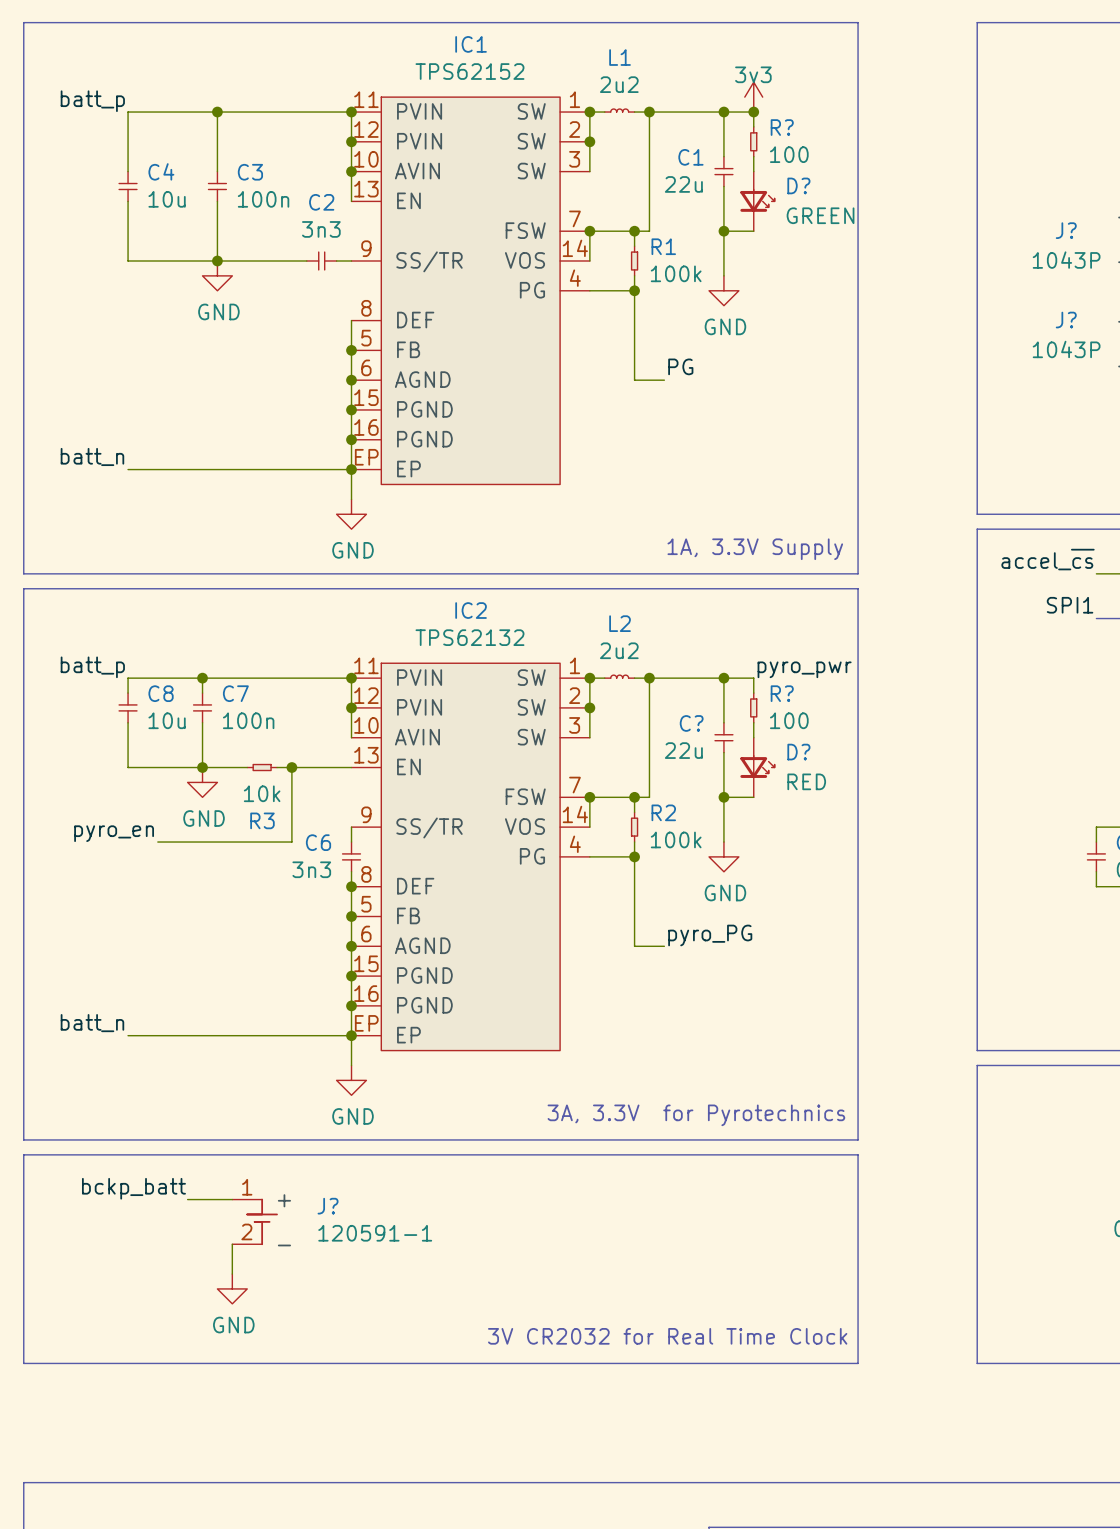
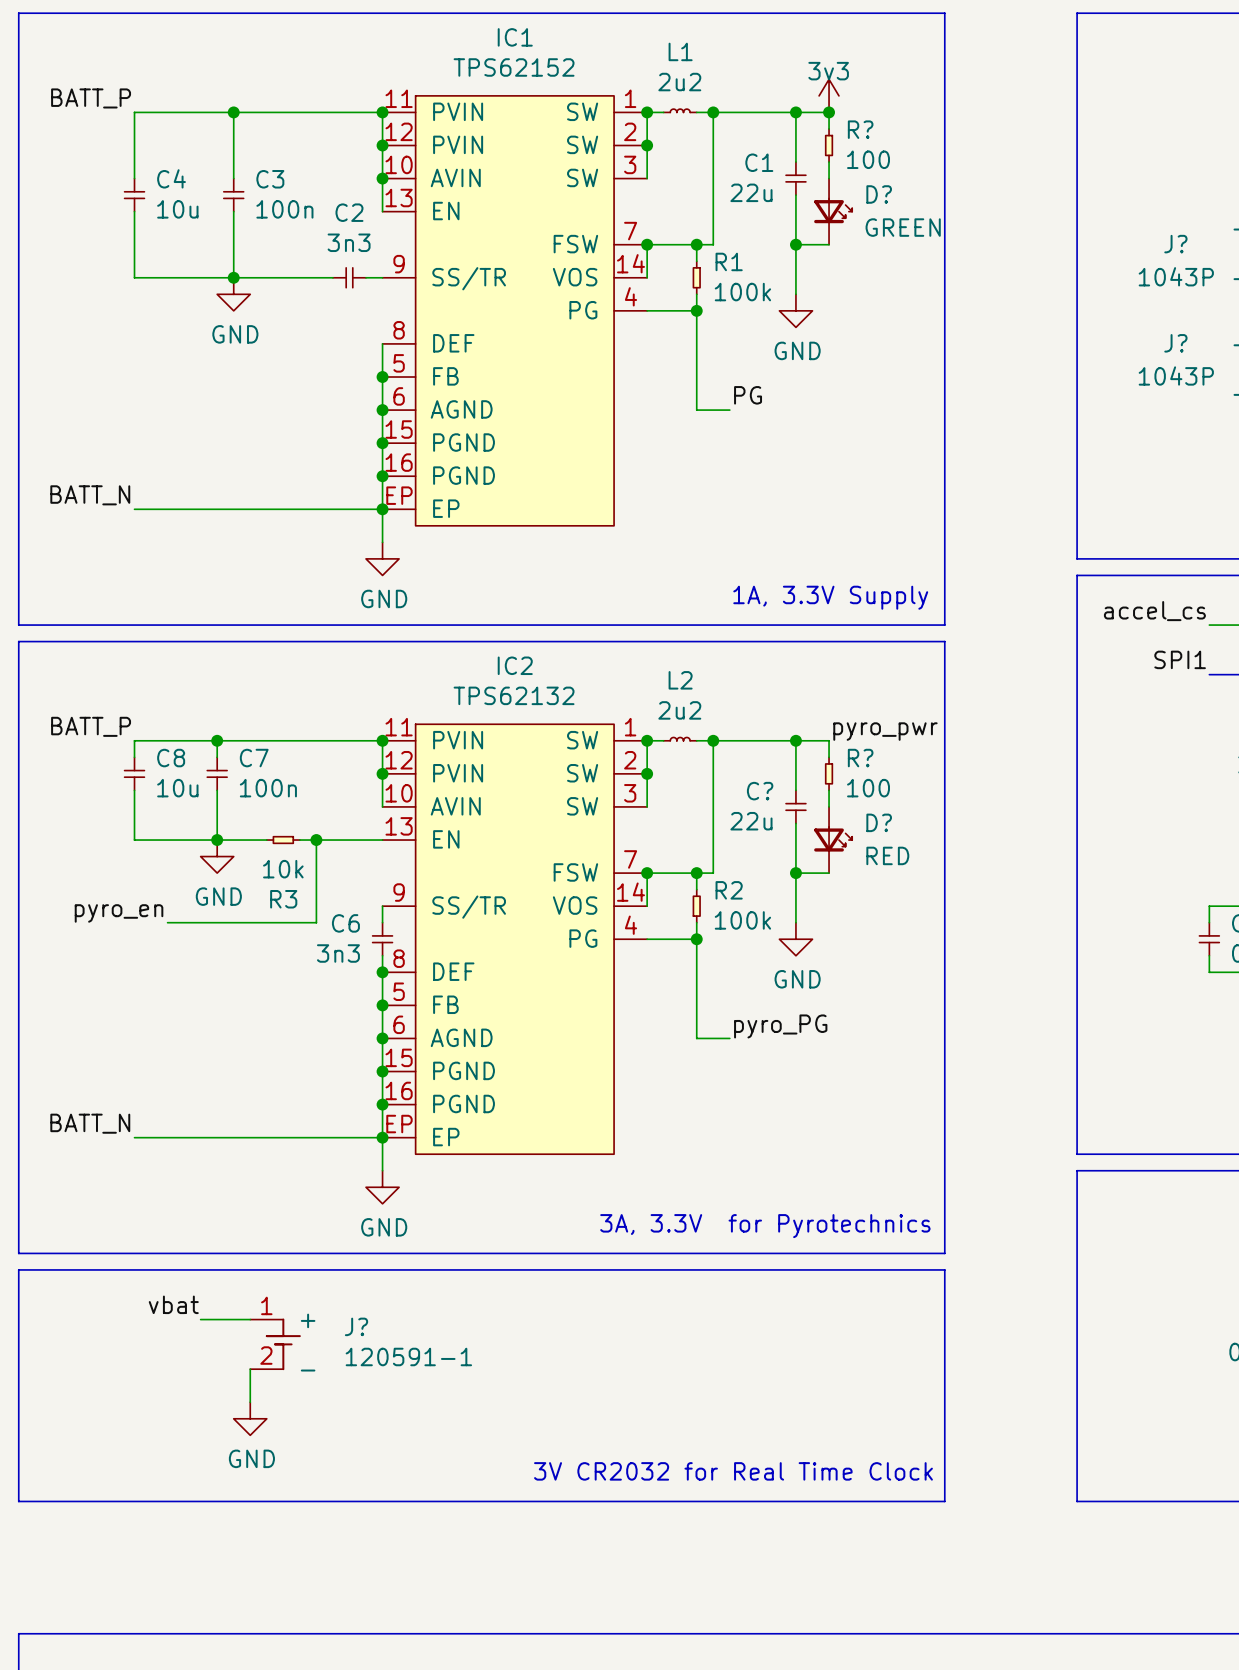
label: batt_p (92, 101) -> BATT_P (91, 98)
label: batt_n (92, 456) -> BATT_N (90, 495)
label: accel_~{cs} (1048, 559) -> accel_cs (1154, 611)
label: batt_p (92, 667) -> BATT_P (91, 726)
label: batt_n (92, 1023) -> BATT_N (90, 1123)
label: bckp_batt (133, 1188) -> vbat (173, 1304)

